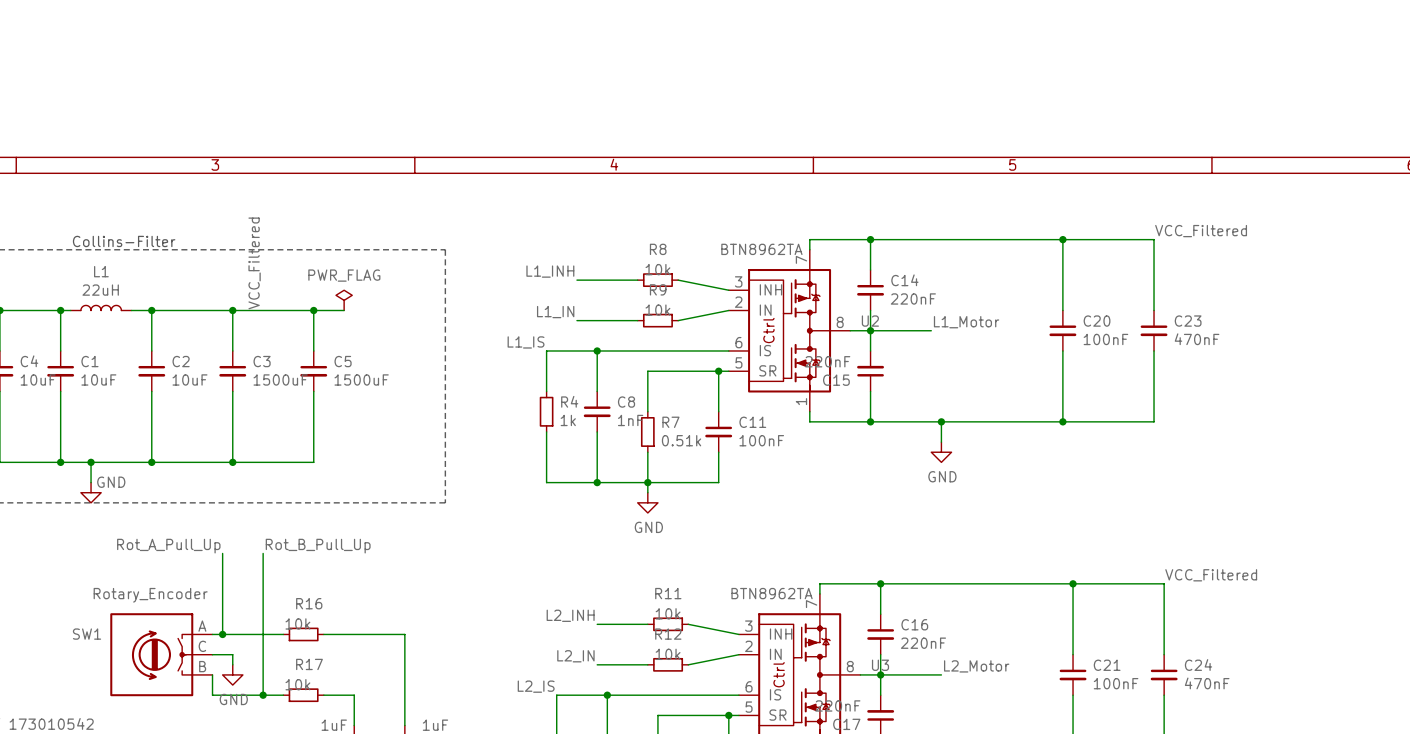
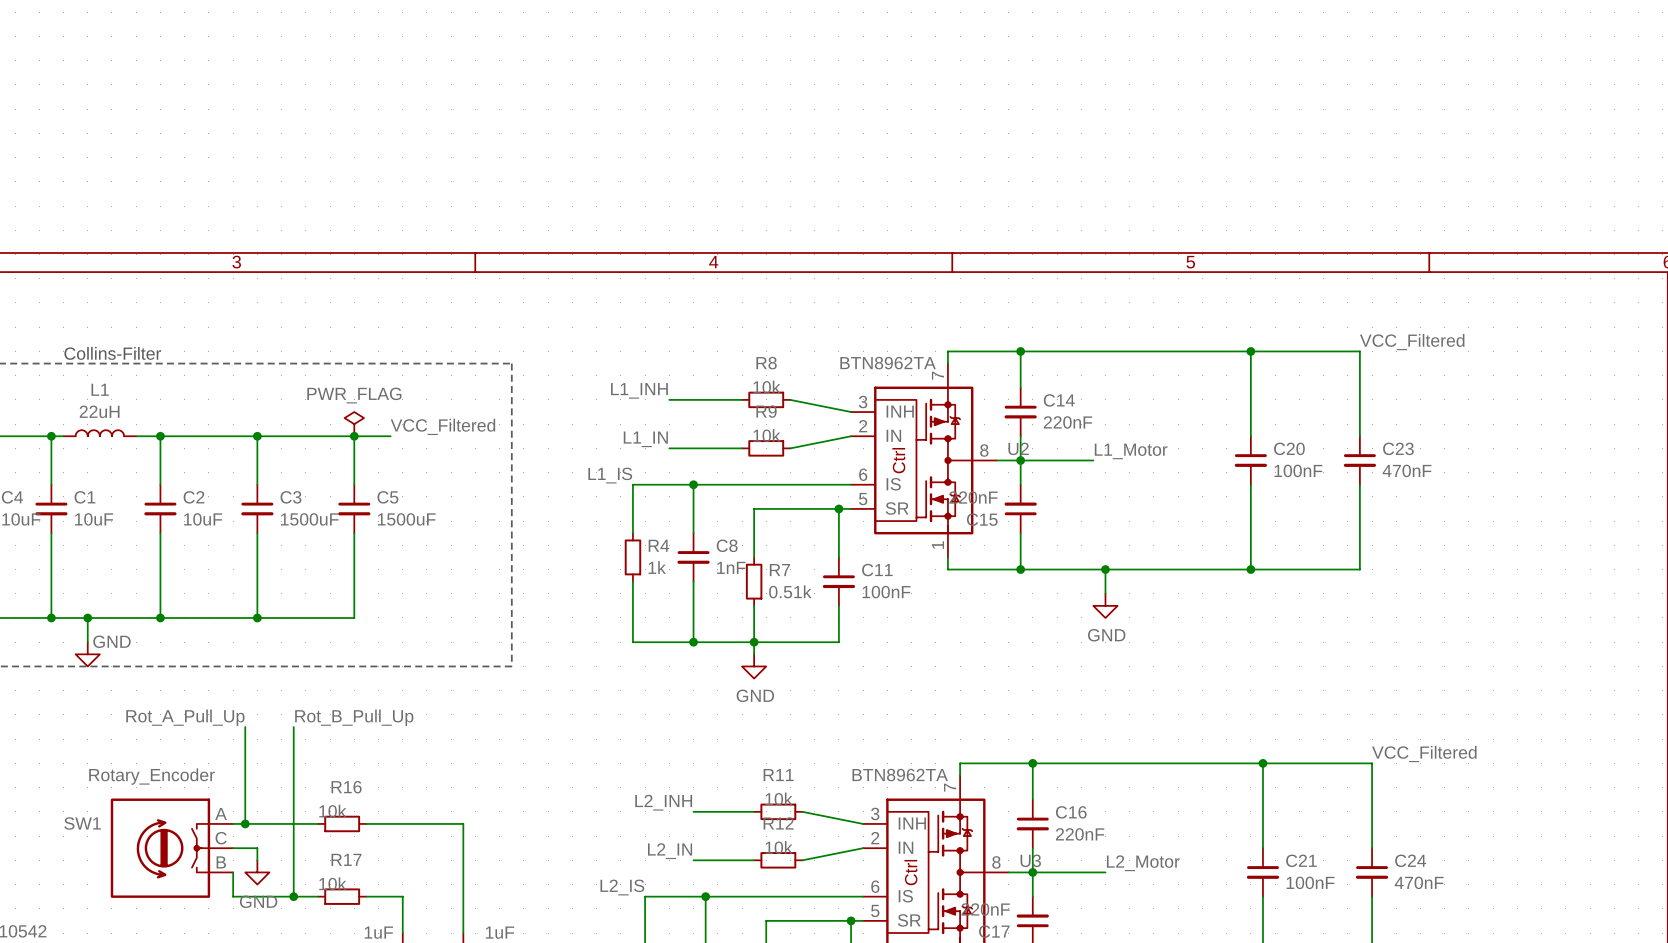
label rotation: 0° (254, 263) -> 90° clockwise (442, 426)
label position: VCC_Filtered (254, 263) -> VCC_Filtered (442, 426)
power symbol position: PWR_FLAG (344, 300) -> PWR_FLAG (354, 424)

